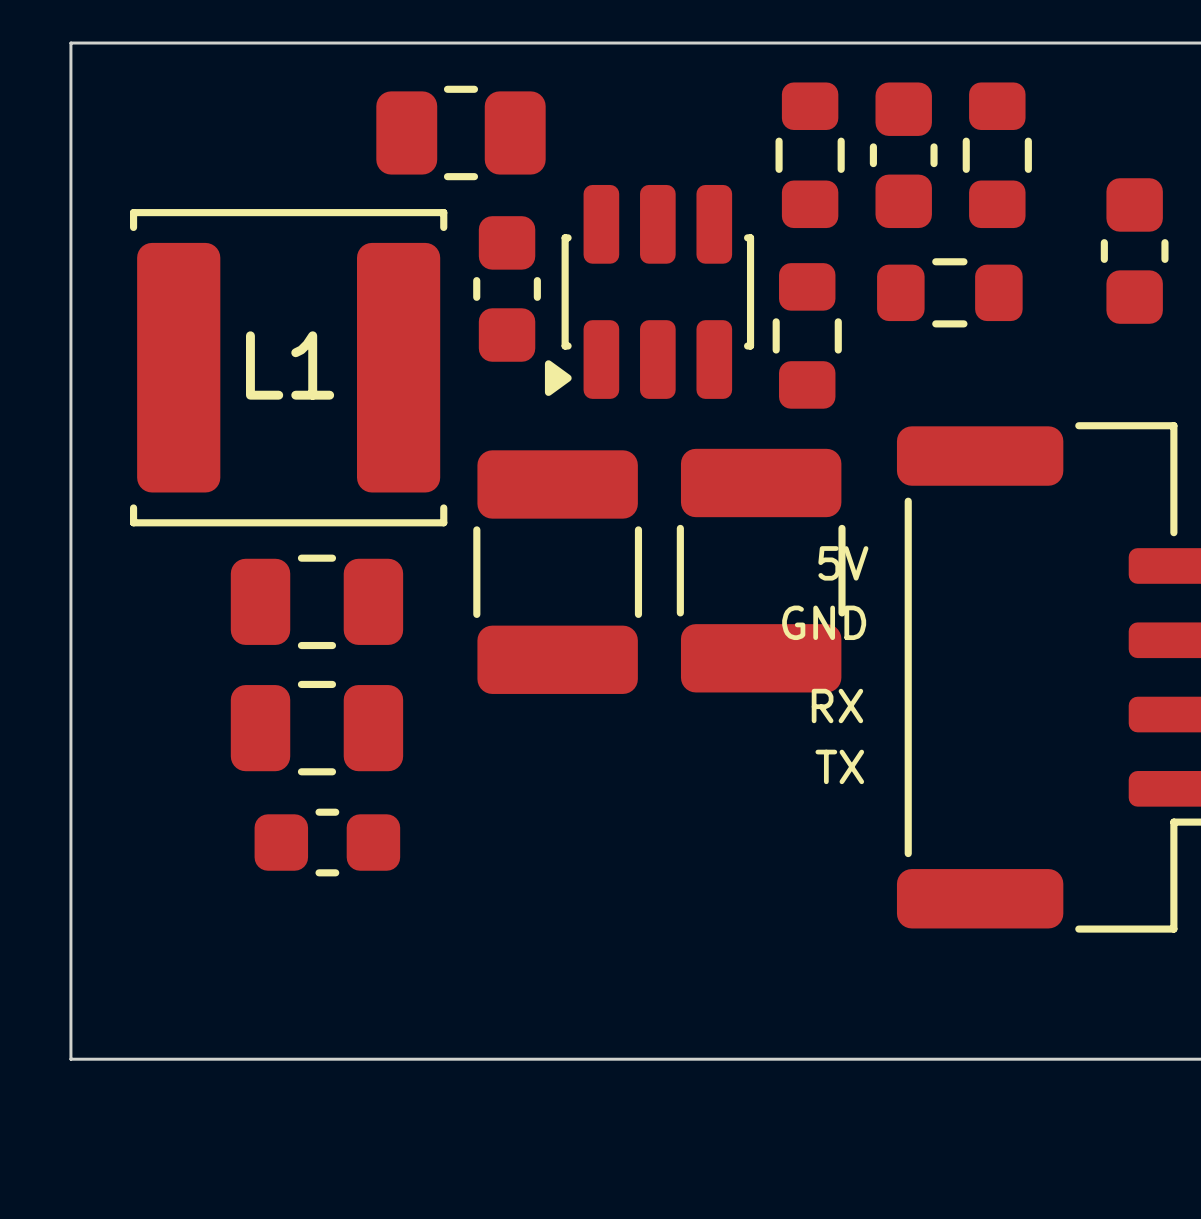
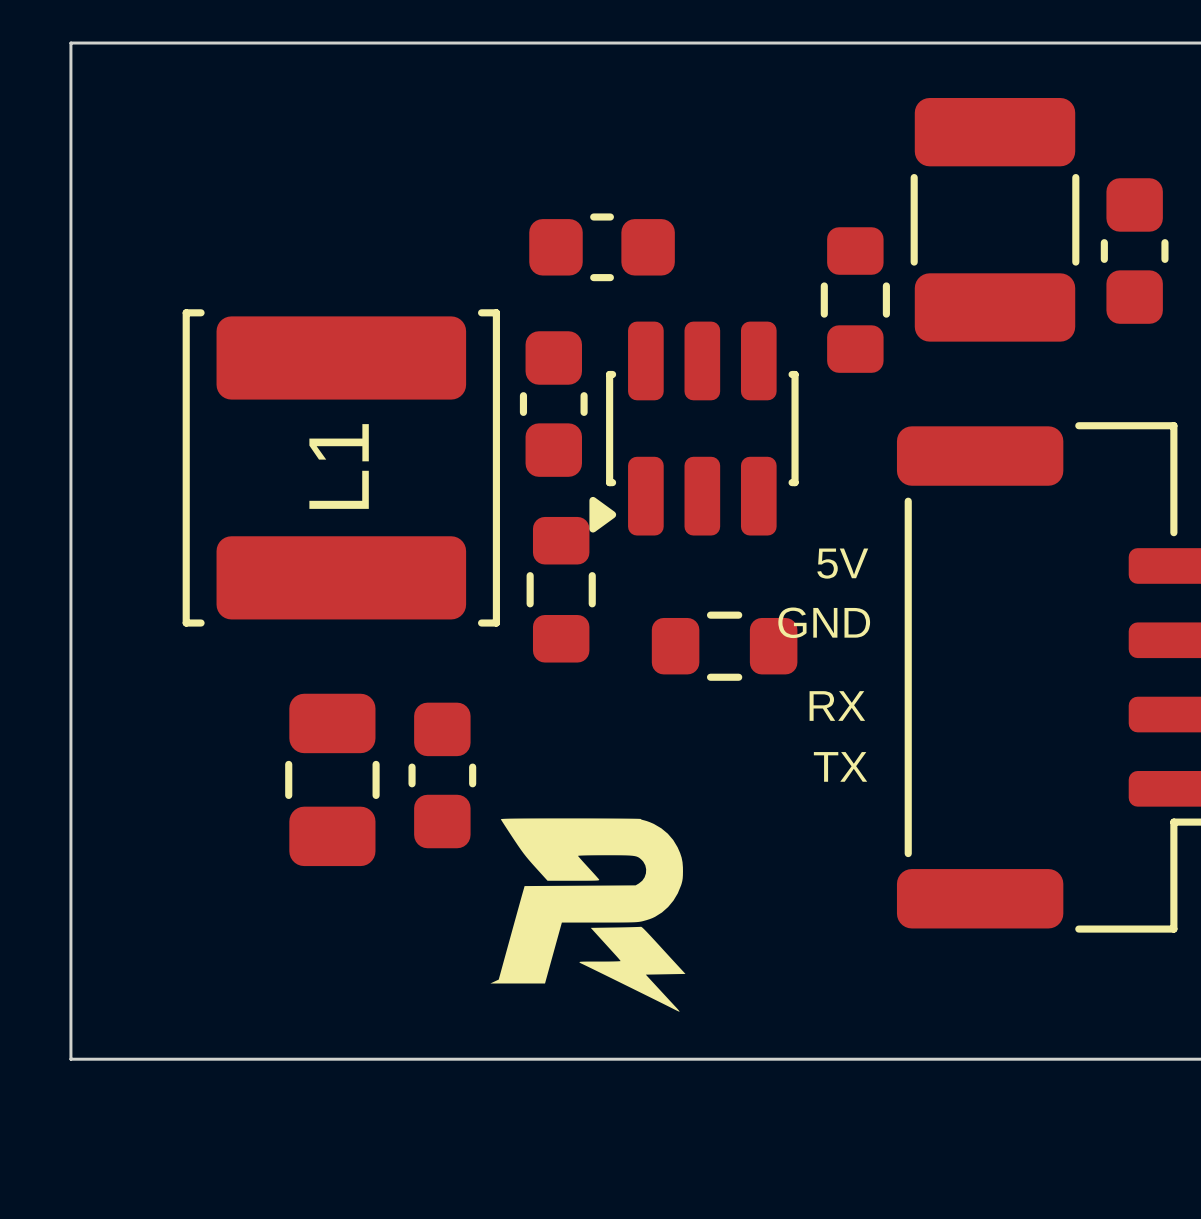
part: (460, 132) -> none
part: (810, 155) -> none
part: (903, 155) -> none
part: (997, 155) -> none
part: none -> (602, 247)
part: (507, 288) -> none
part position: (649, 291) -> (694, 428)
part: (949, 292) -> none
part: none -> (855, 300)
part: (807, 335) -> none
L1 rotation: 0° (288, 367) -> 90° clockwise (341, 467)
part: none -> (553, 404)
part footprint: [473, 450, 643, 694] -> [526, 516, 596, 663]
part position: (761, 570) -> (995, 219)
part: (316, 601) -> none
part: none -> (724, 646)
part rotation: 0° (316, 728) -> 90° clockwise (332, 779)
drawing: none -> [490, 818, 686, 1012]
part rotation: 0° (327, 842) -> 90° clockwise (442, 775)
part position: (327, 842) -> (442, 775)

